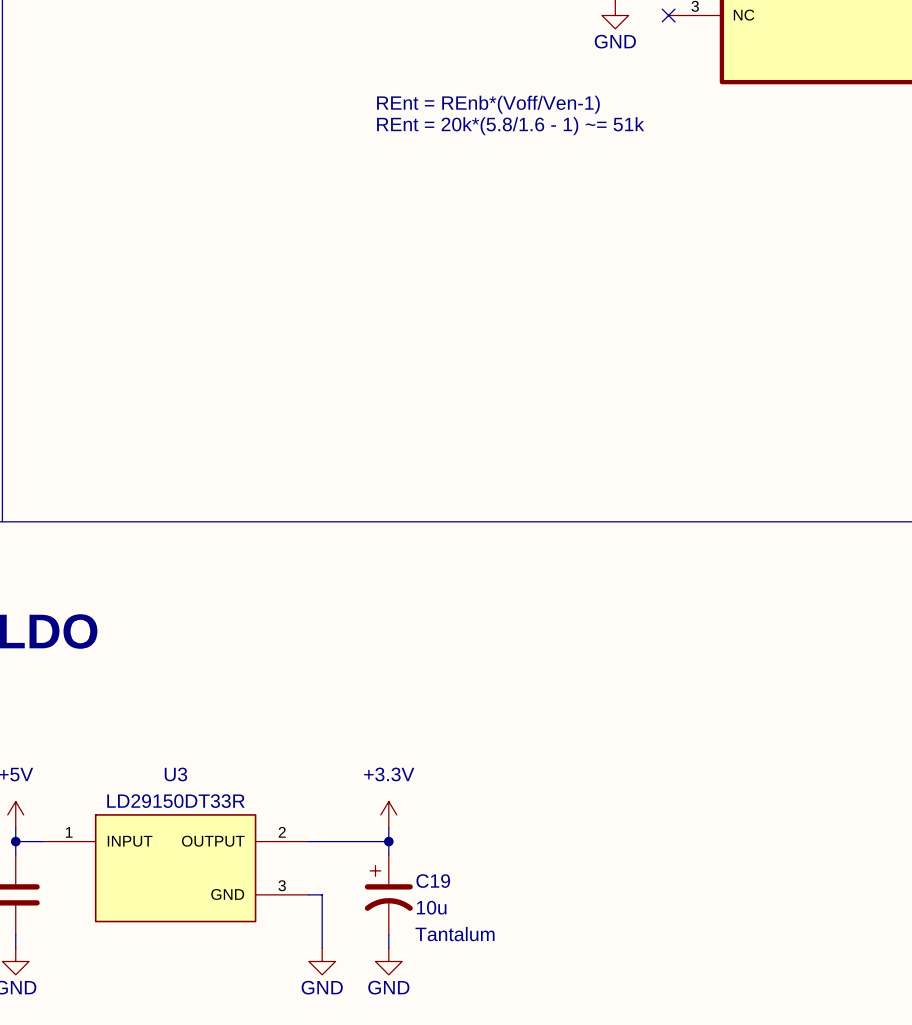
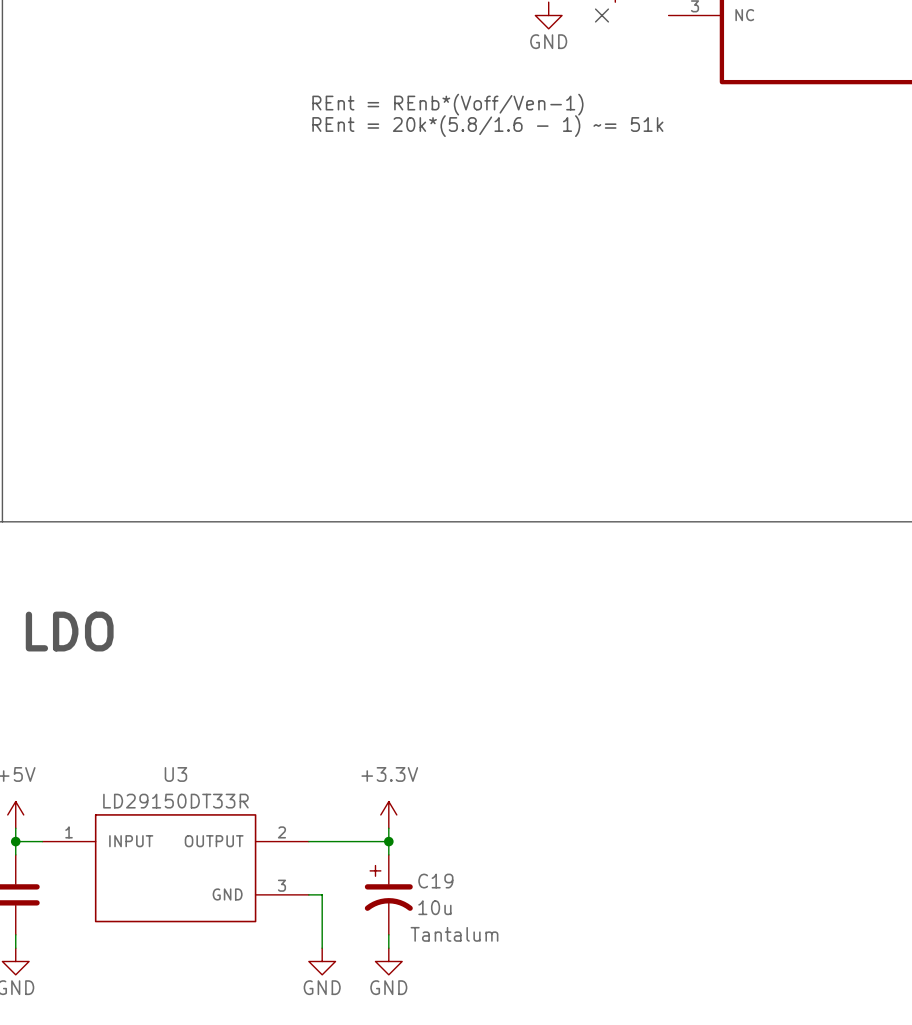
power symbol: none -> GND (548, 15)
no-connect mark: none -> (601, 15)
power symbol: GND (615, 15) -> none
no-connect mark: (668, 15) -> none
text position: REnt = REnb*(Voff/Ven-1) (488, 104) -> REnt = REnb*(Voff/Ven-1) (447, 104)
text position: REnt = 20k*(5.8/1.6 - 1) ~= 51k (510, 126) -> REnt = 20k*(5.8/1.6 - 1) ~= 51k (487, 126)

